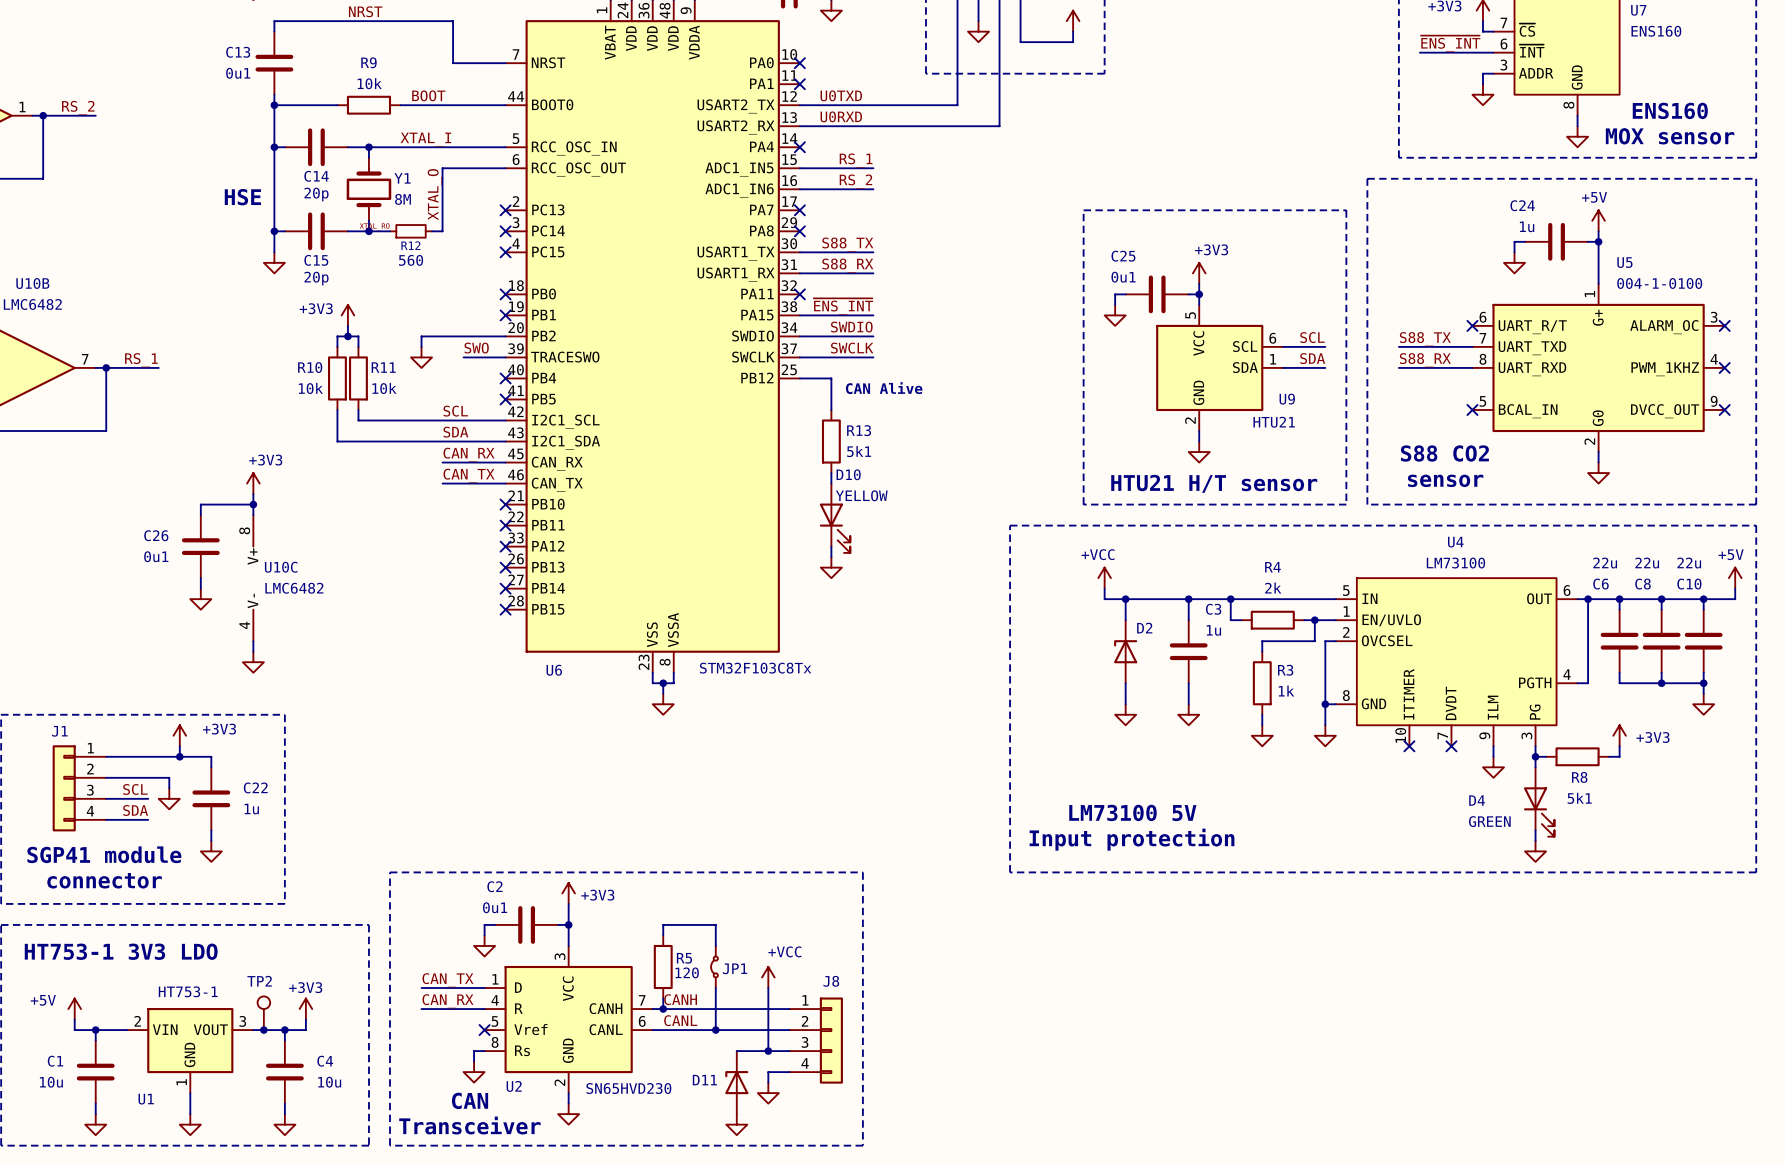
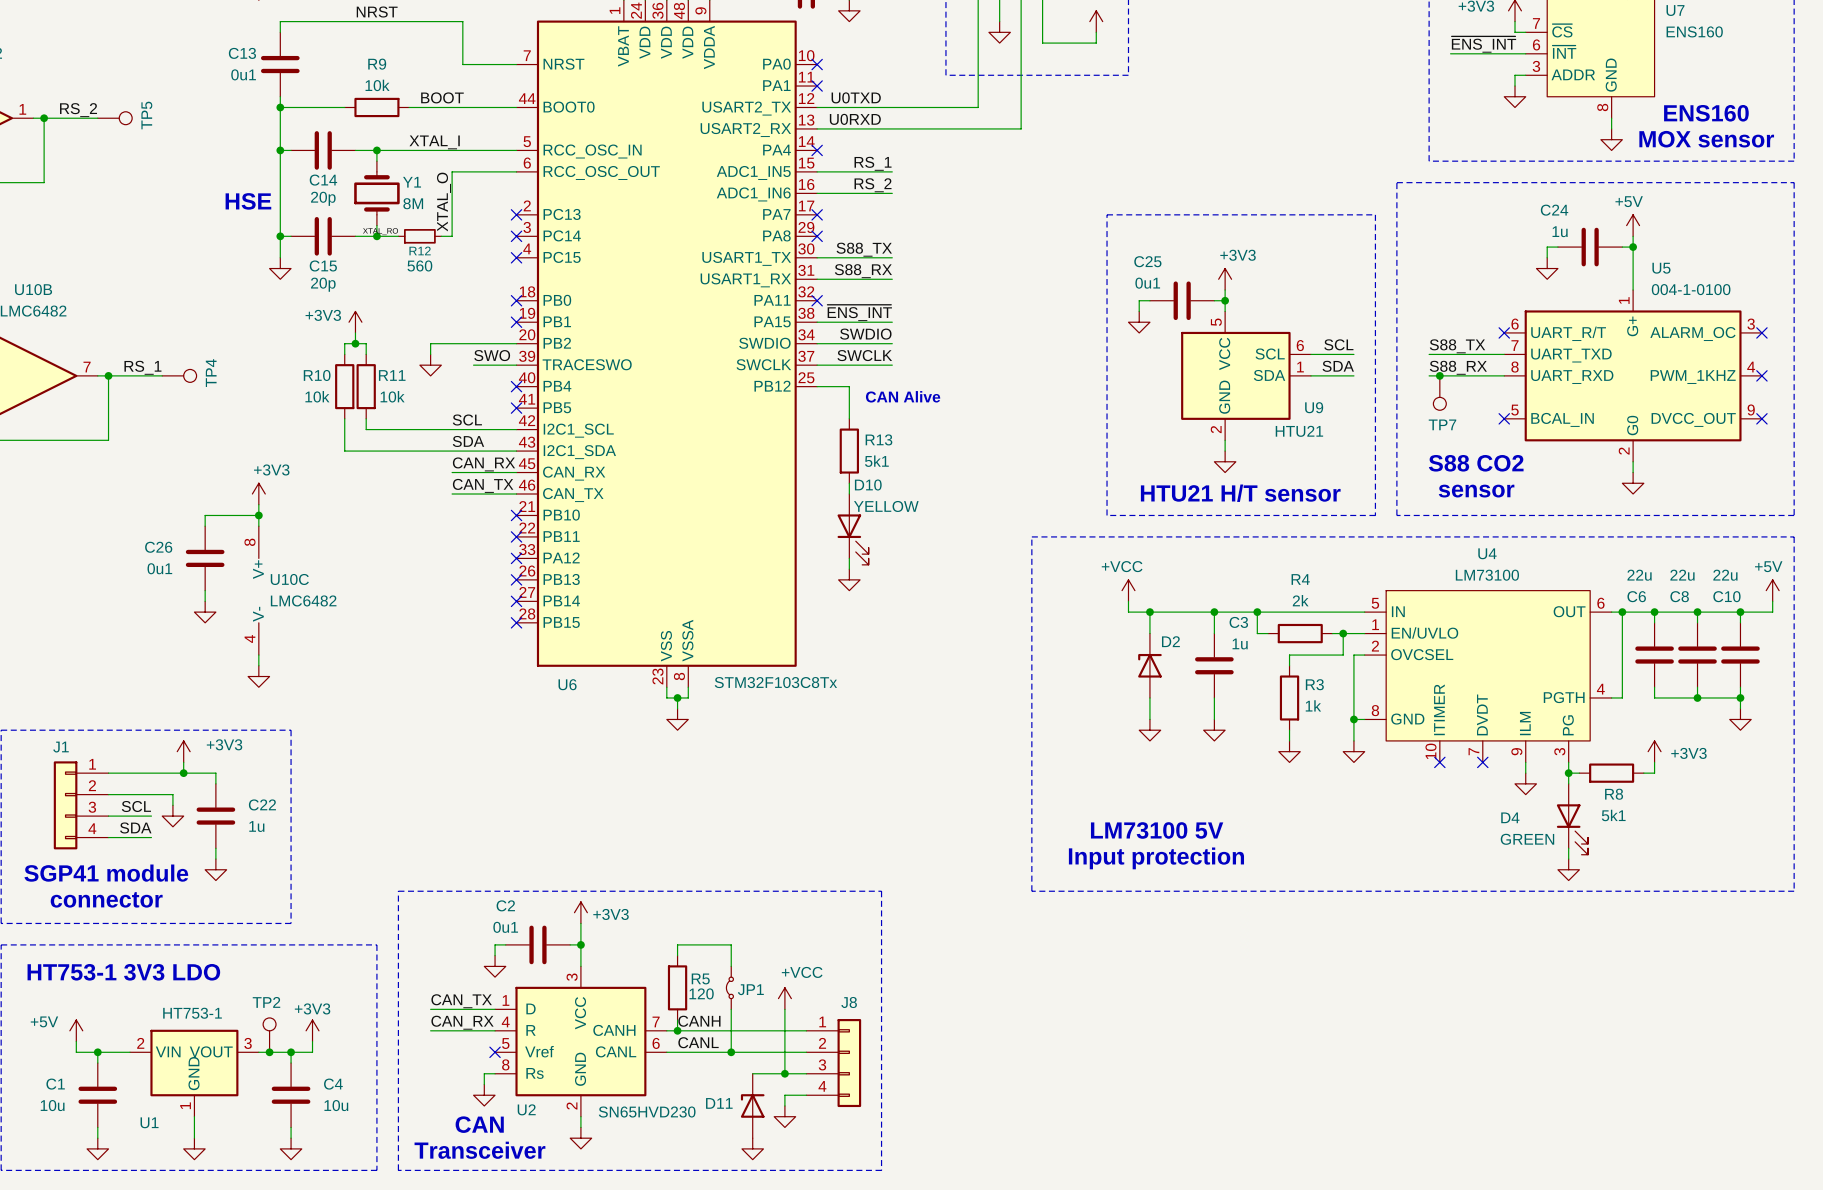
TP5: none -> (114, 118)
TP4: none -> (179, 375)
junction: none -> (1439, 375)
TP7: none -> (1439, 393)

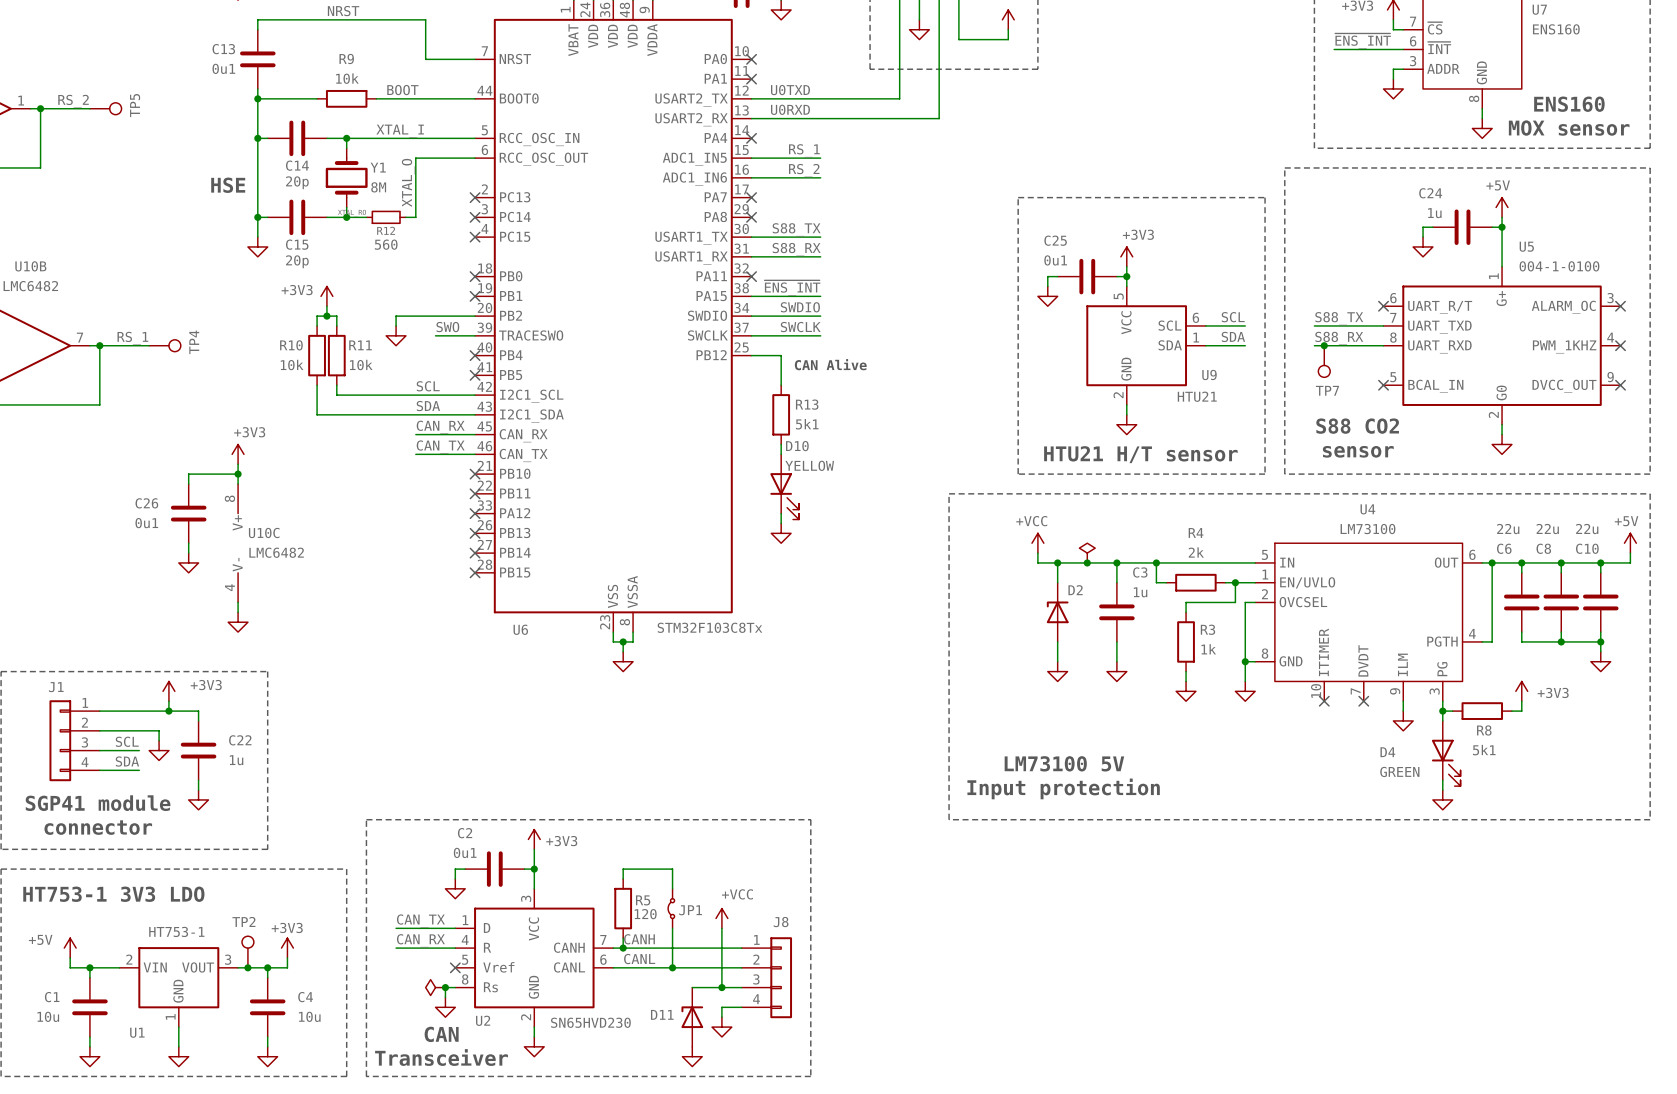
power symbol: none -> (1087, 553)
junction: none -> (1087, 562)
power symbol: none -> (435, 987)
junction: none -> (445, 987)

